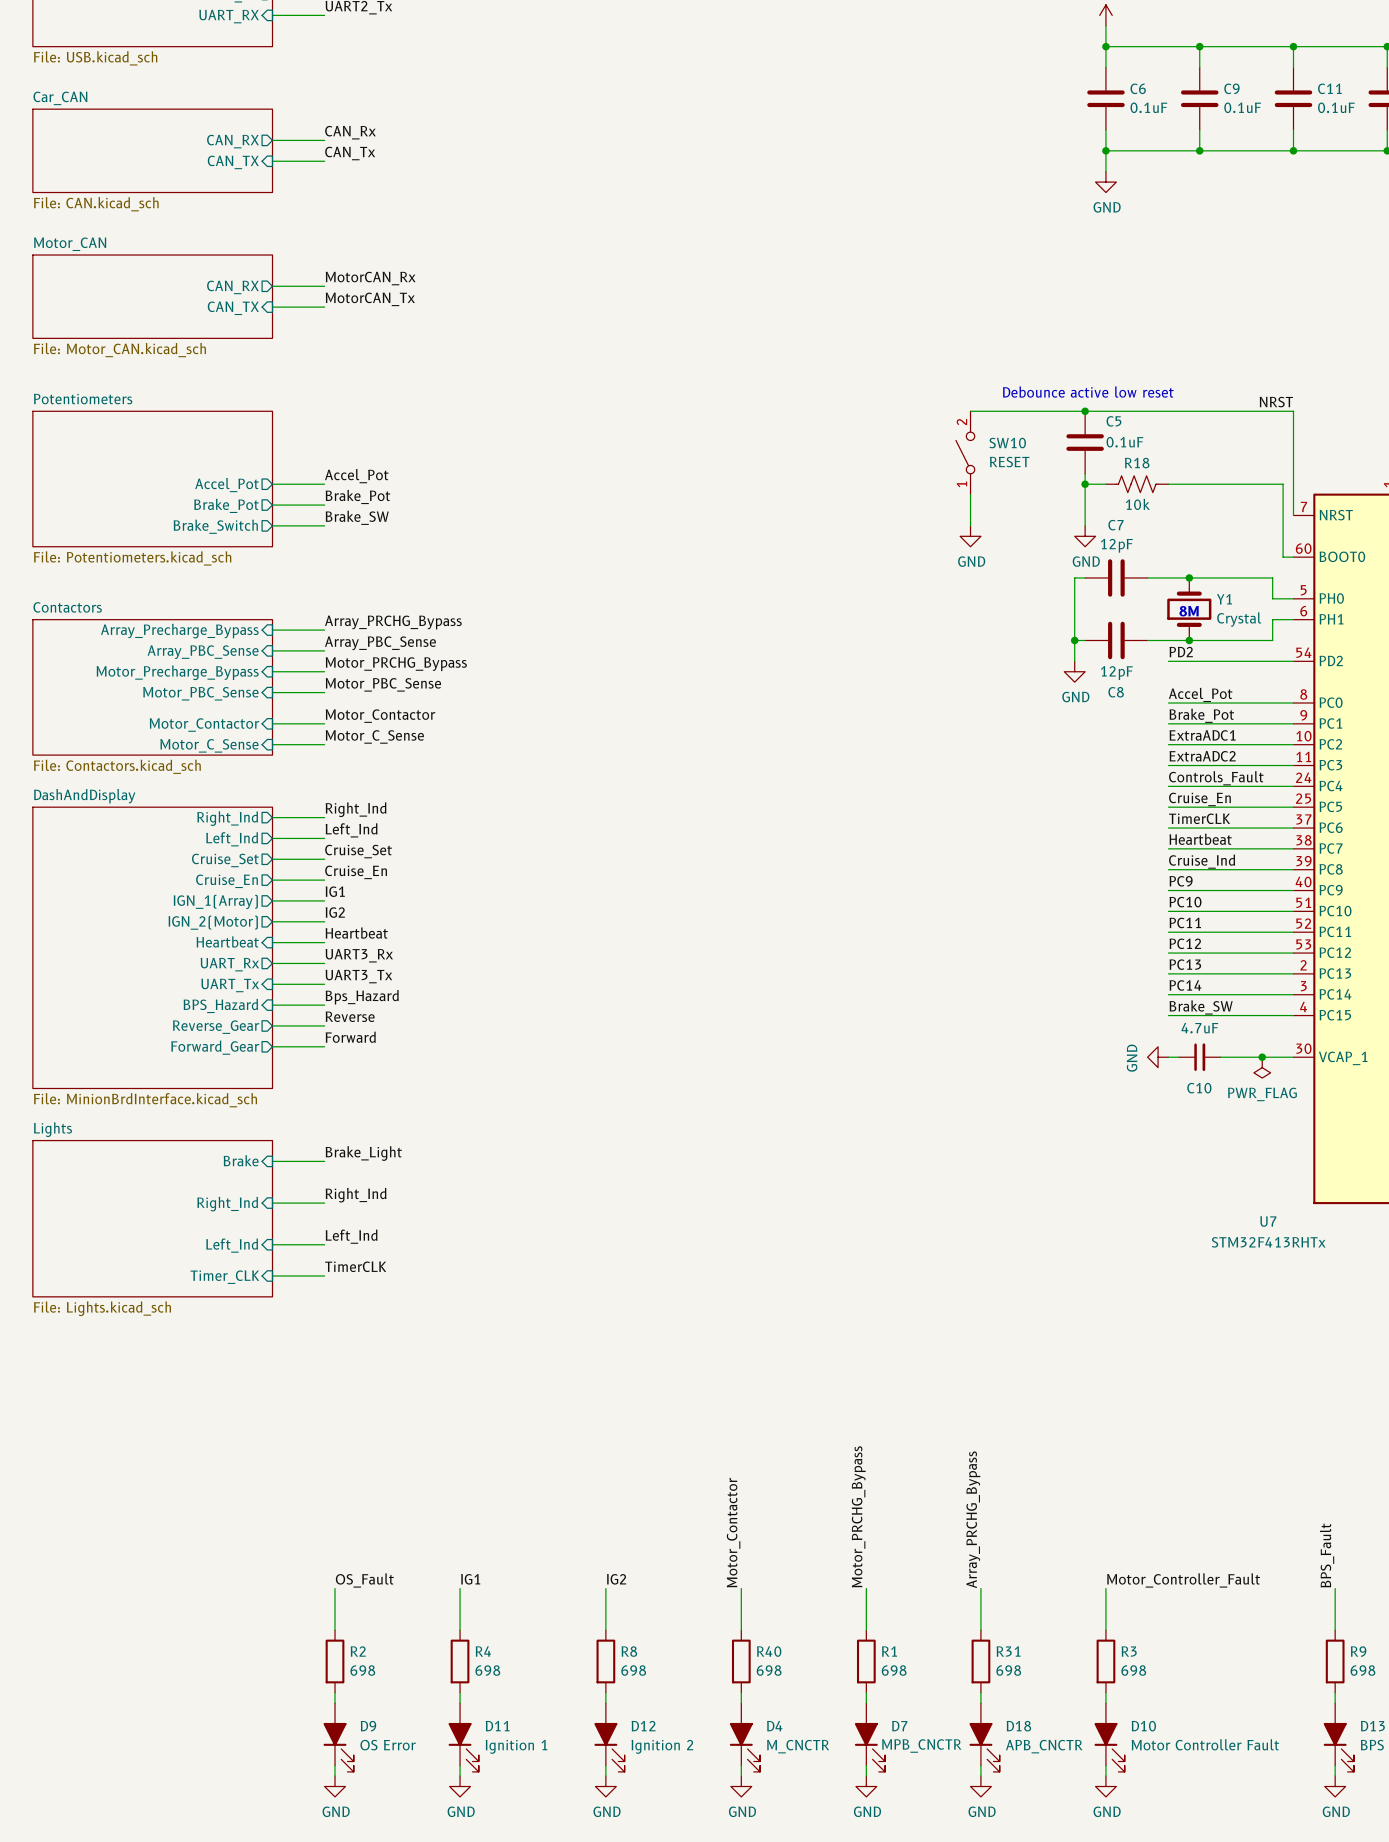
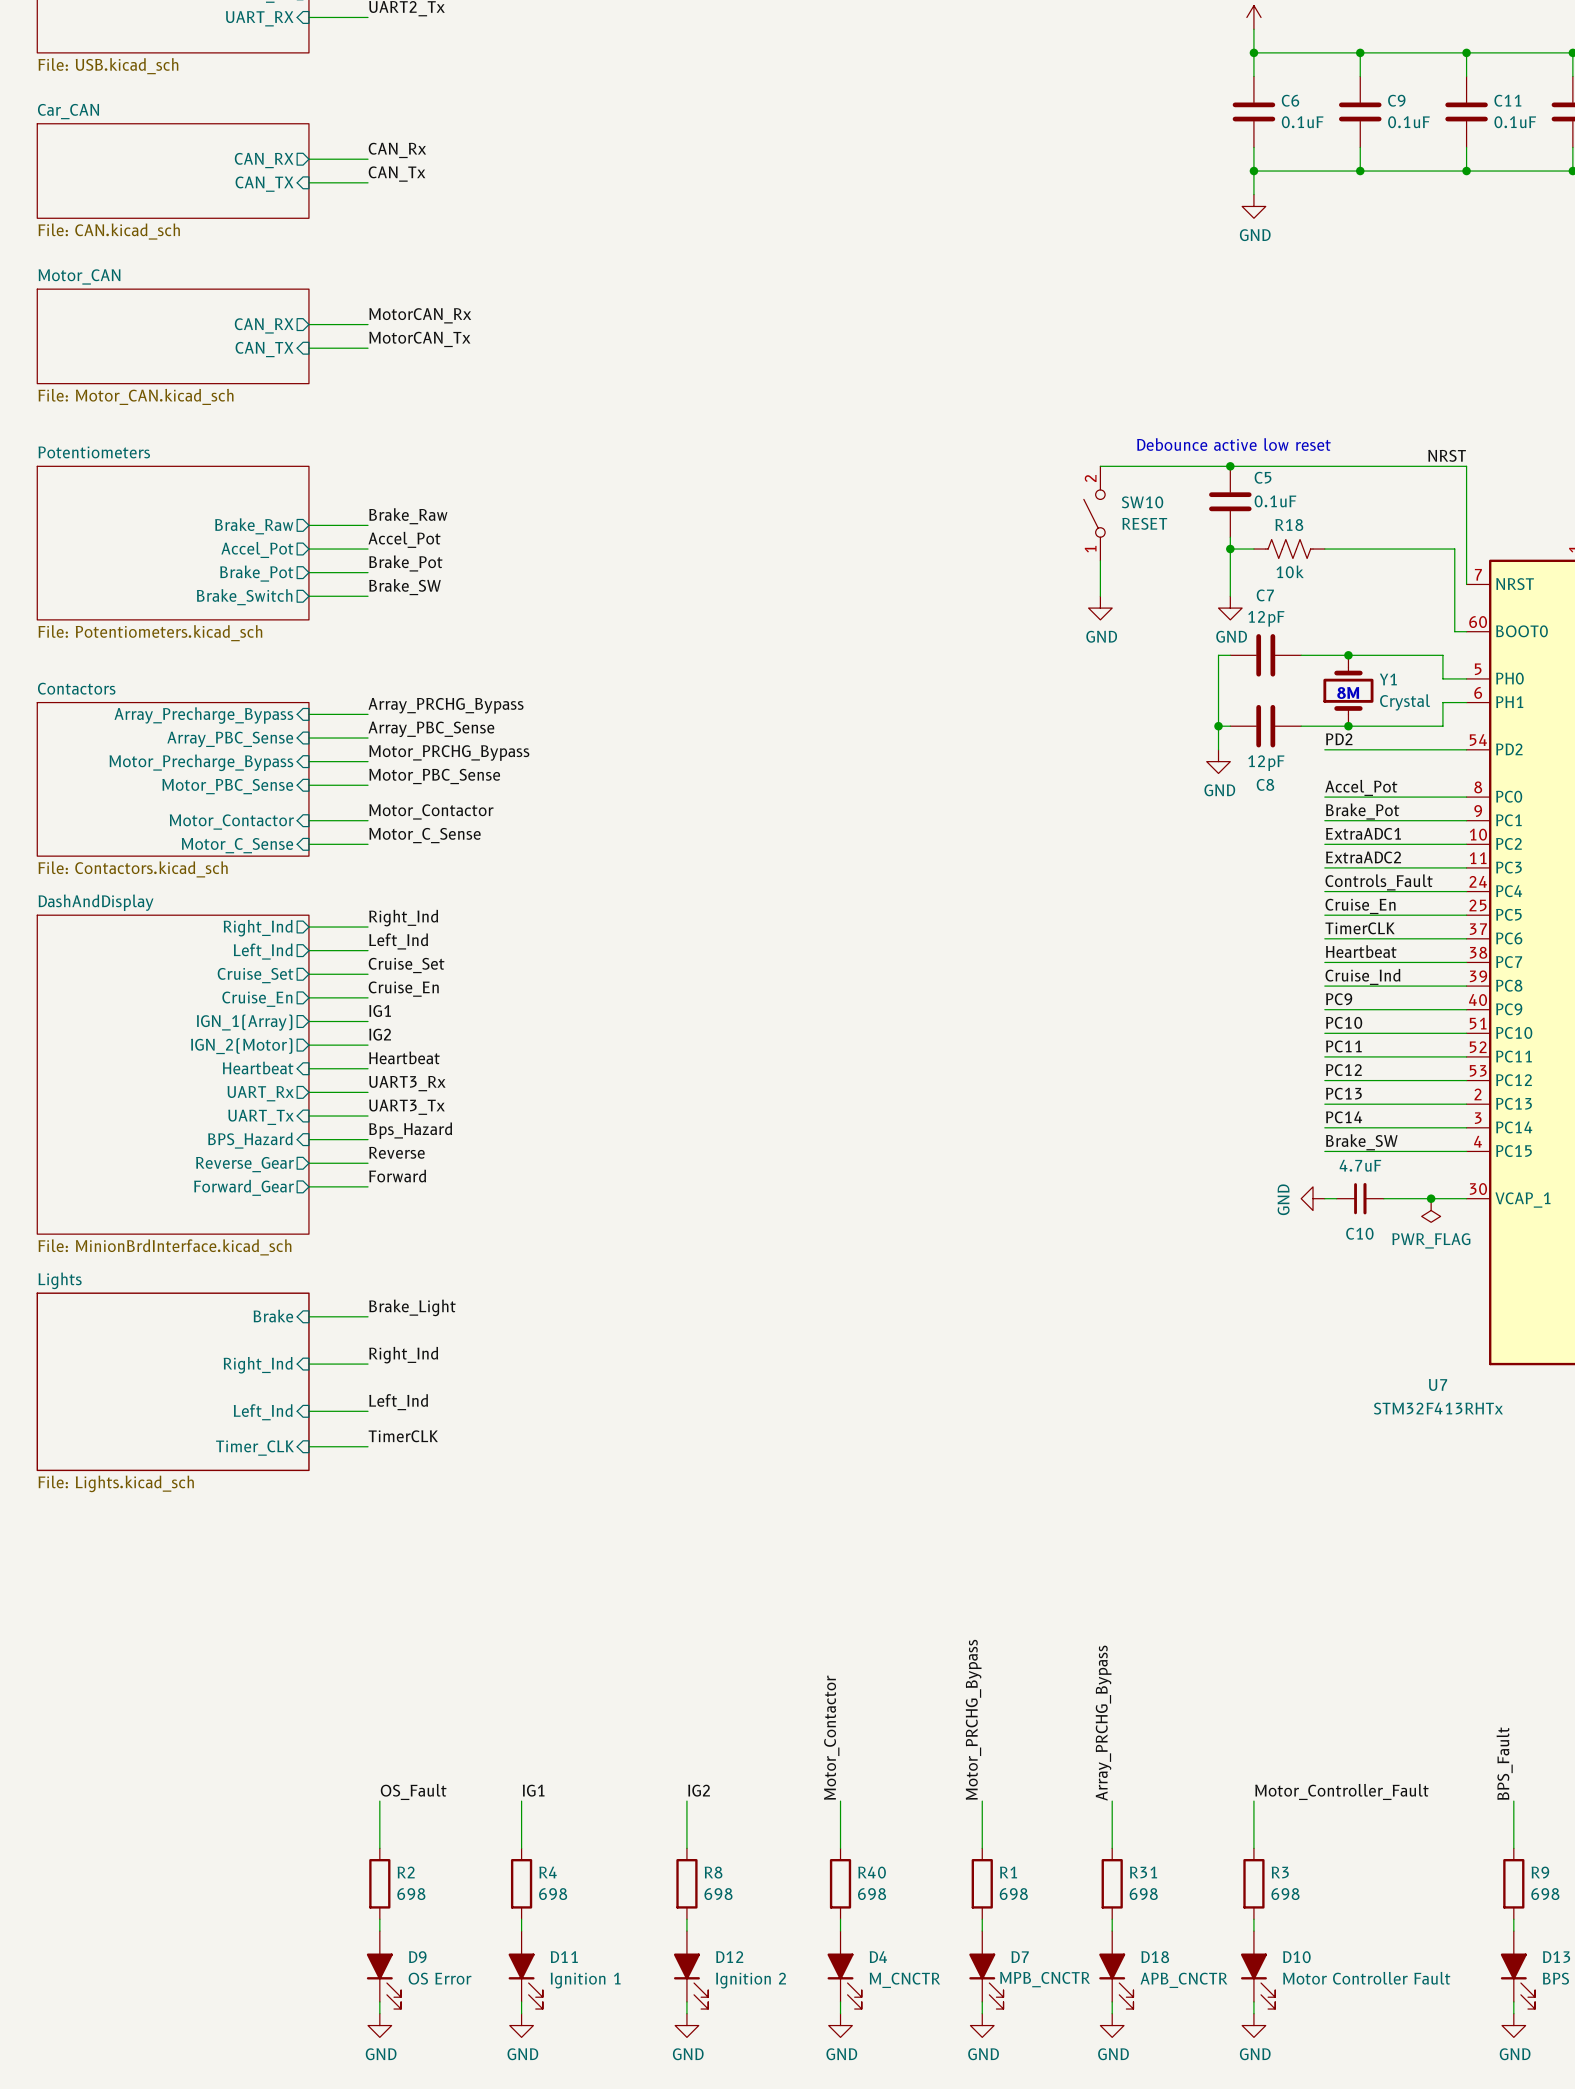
label: none -> Brake_Raw (408, 516)
wire: none -> (308, 525) (368, 525)
sheet pin: none -> Brake_Raw (254, 526)

